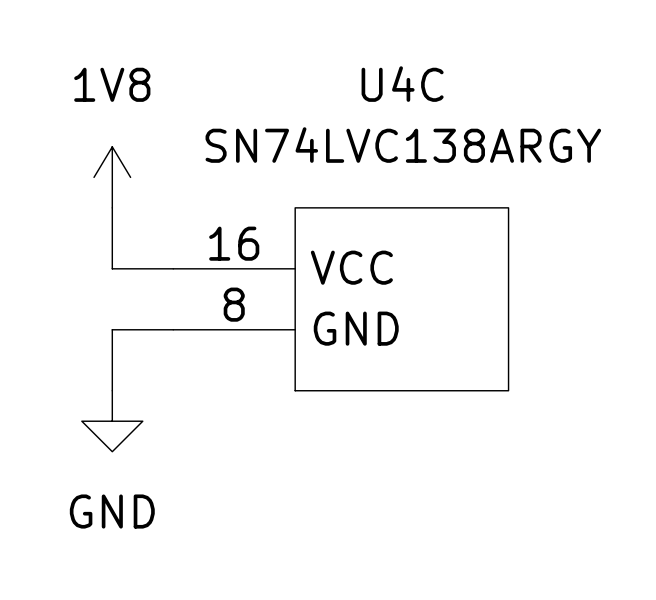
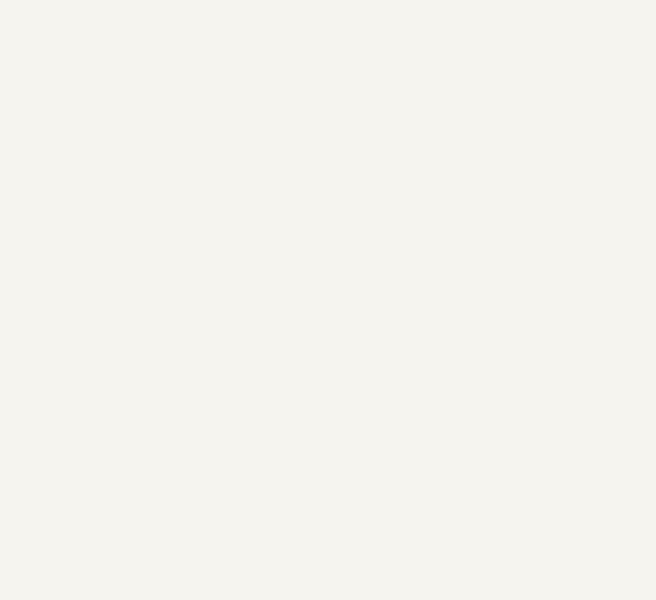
power symbol: 1V8 (112, 177) -> none
wire: (112, 207) (112, 268) (173, 268) -> none
U4C: SN74LVC138ARGY (340, 299) -> none
wire: (173, 329) (112, 329) (112, 390) -> none
power symbol: GND (112, 421) -> none

